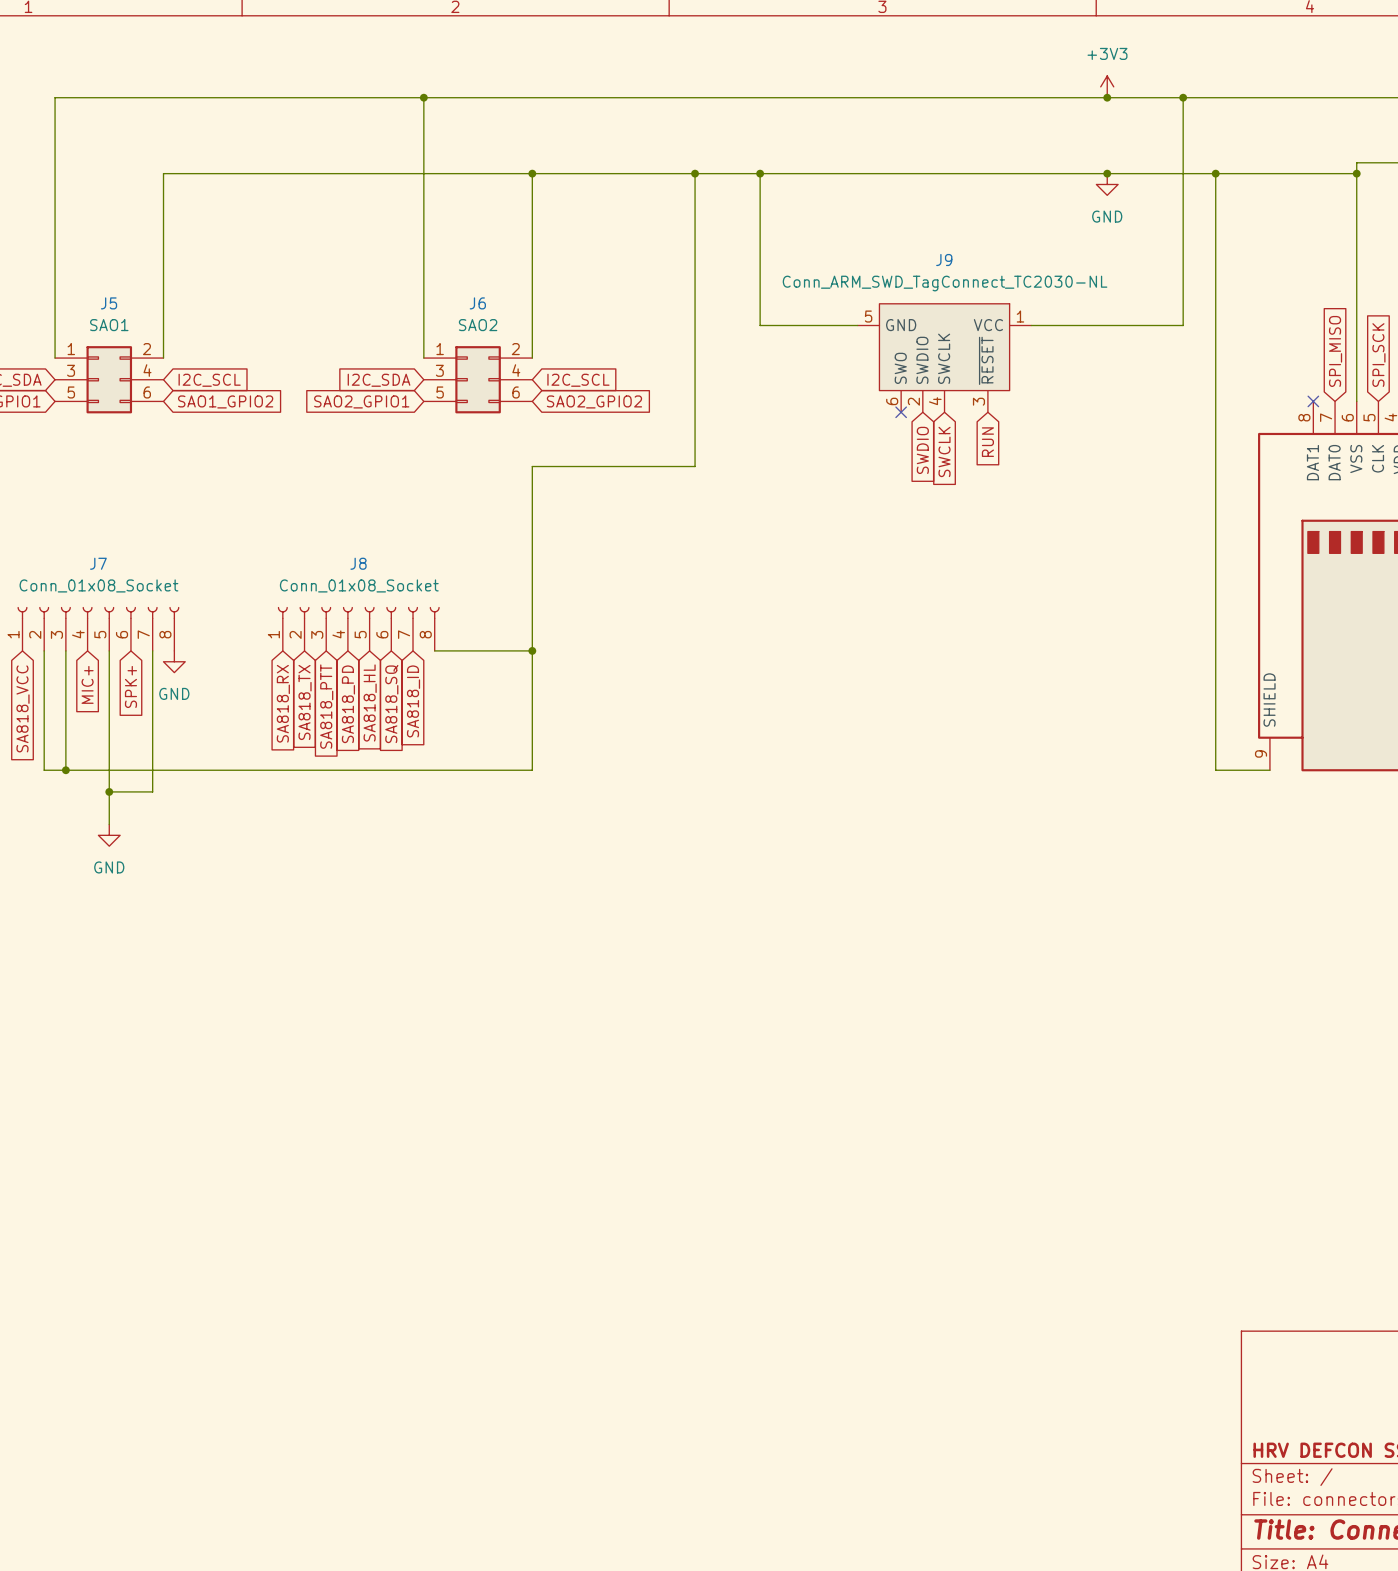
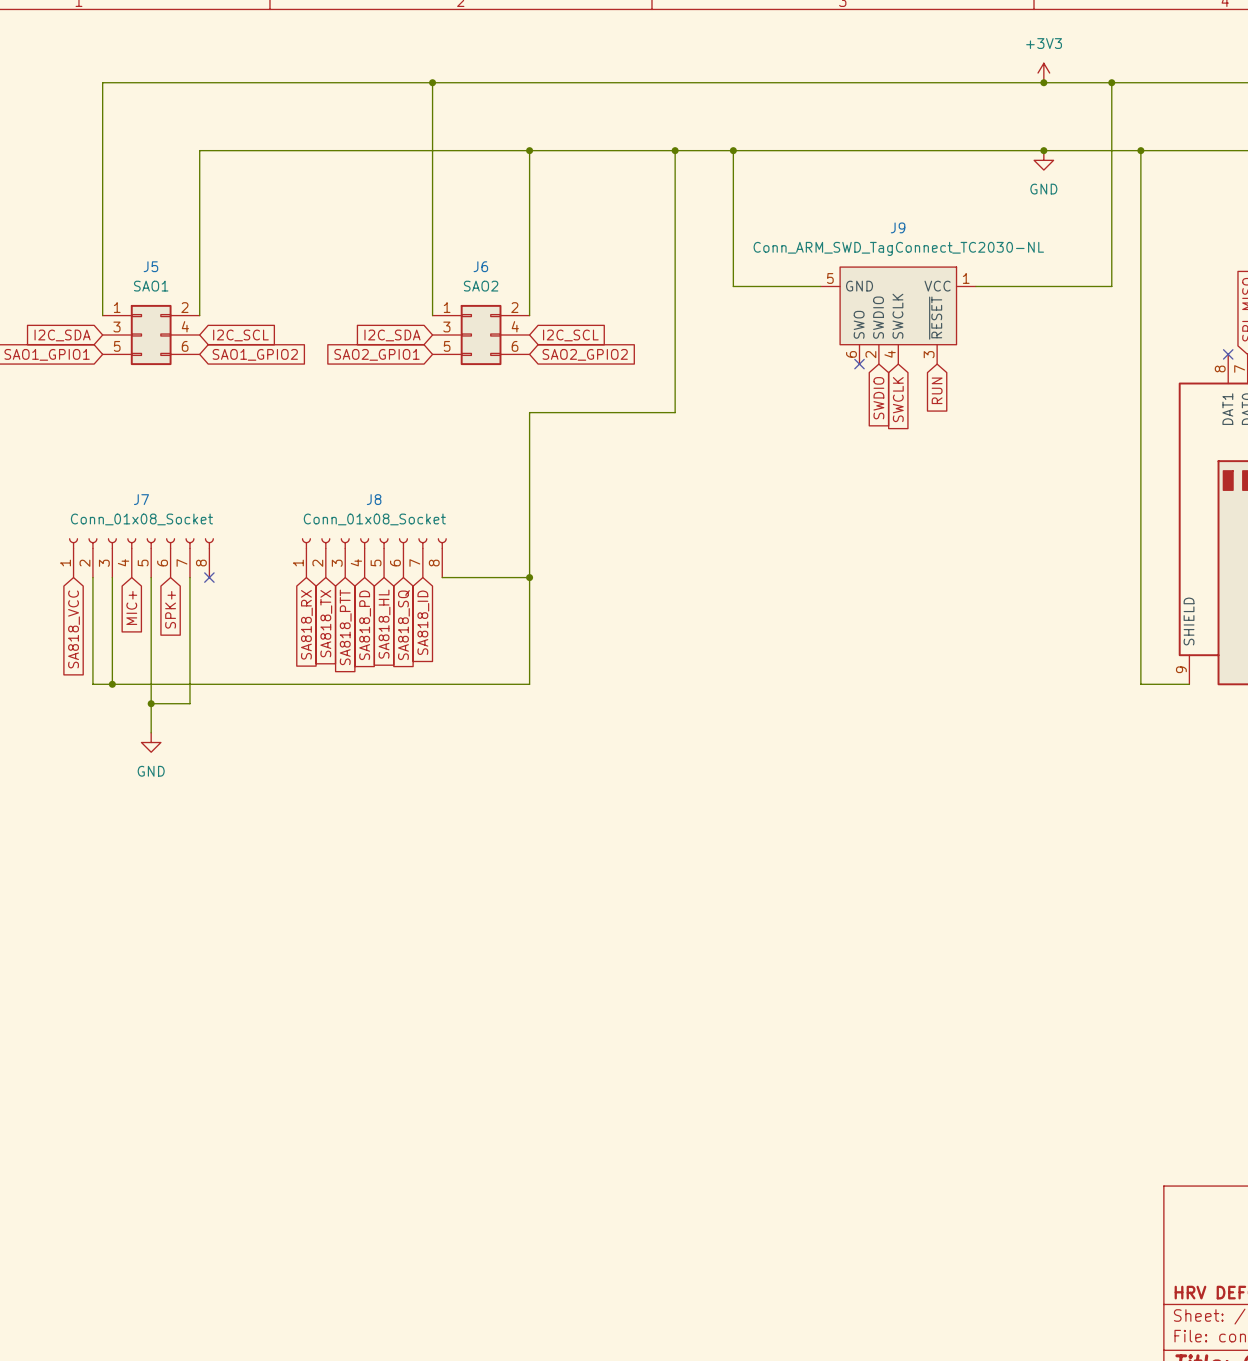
no-connect mark: none -> (209, 577)
power symbol: GND (174, 661) -> none

